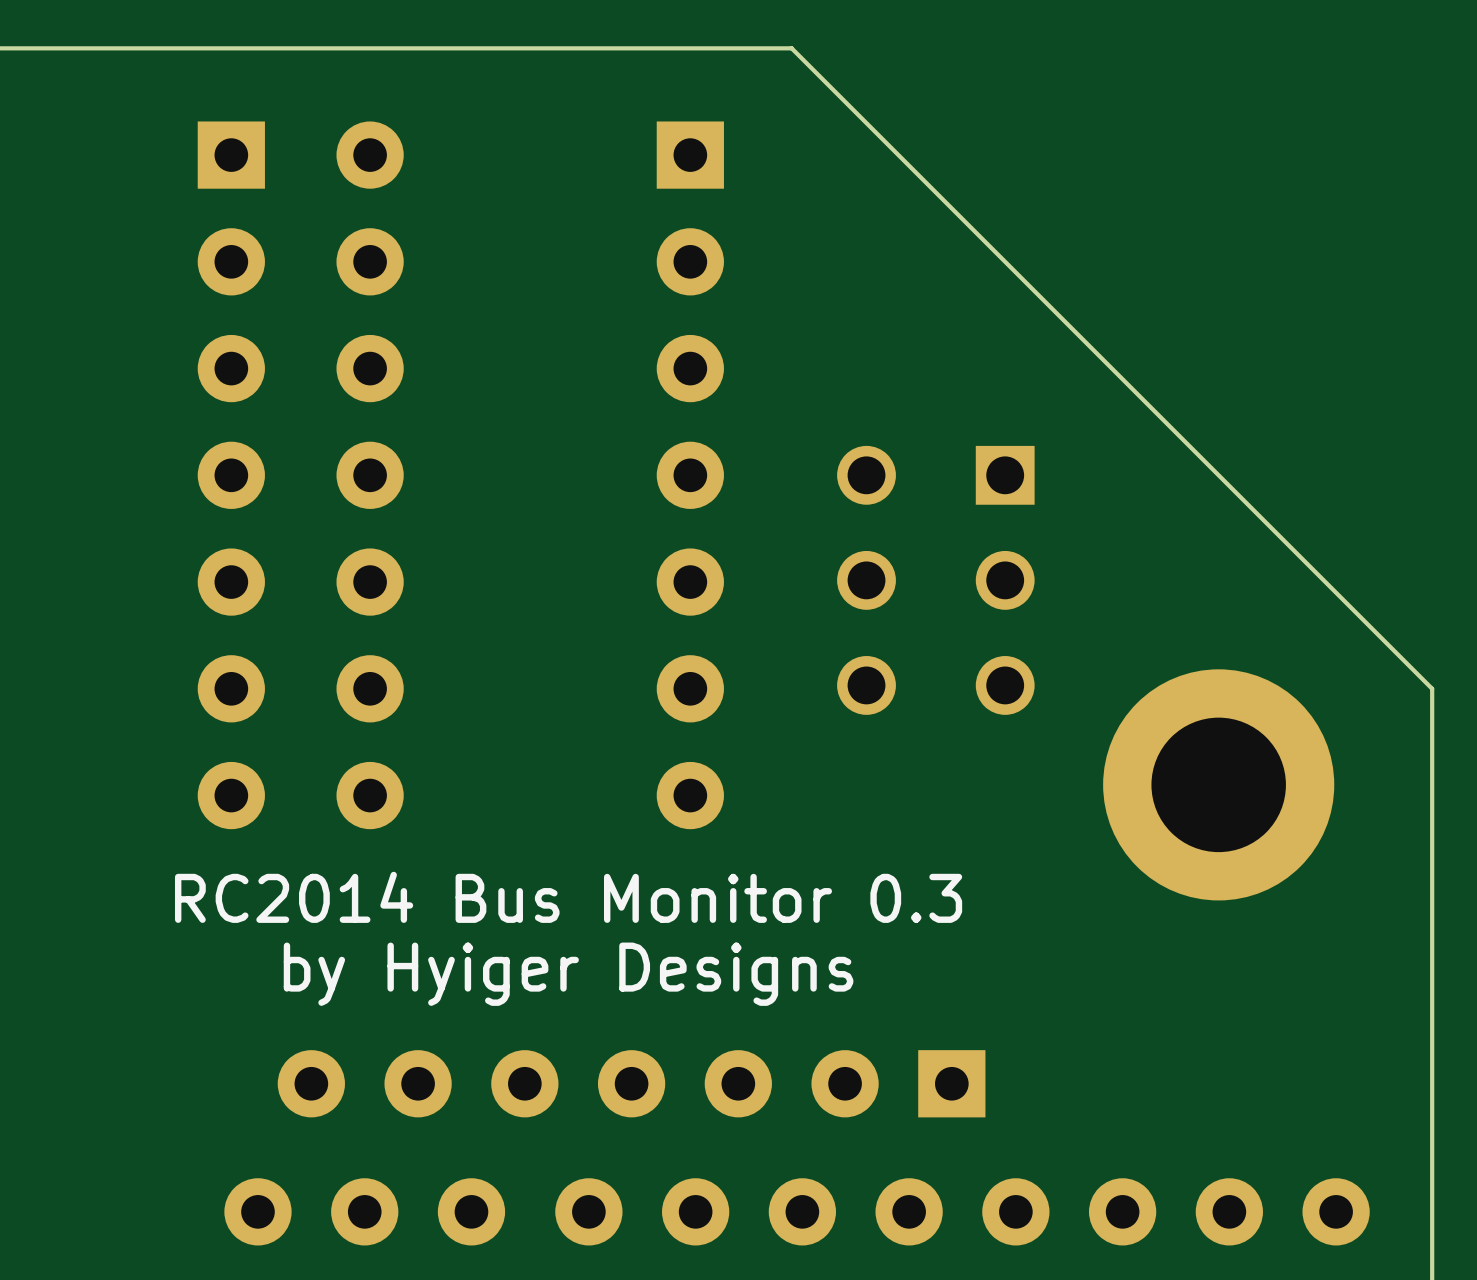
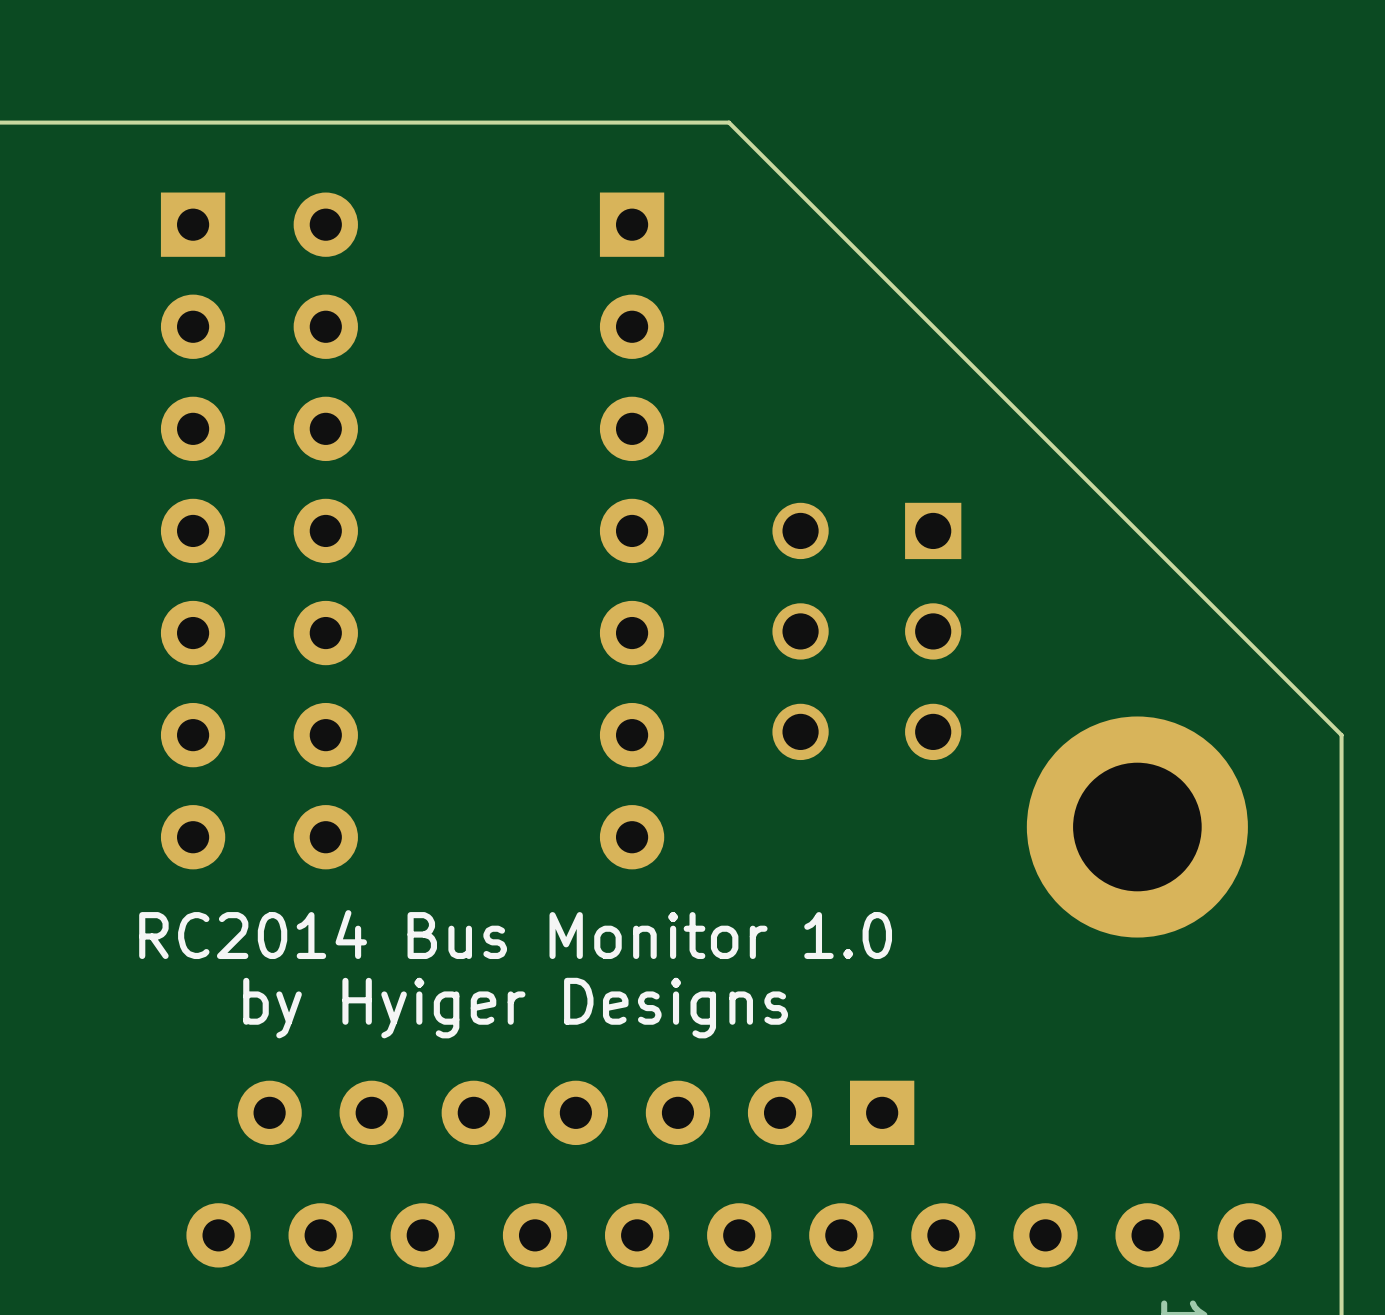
text: RC2014 Bus Monitor 0.3 (568, 897) -> RC2014 Bus Monitor 1.0 (515, 934)

